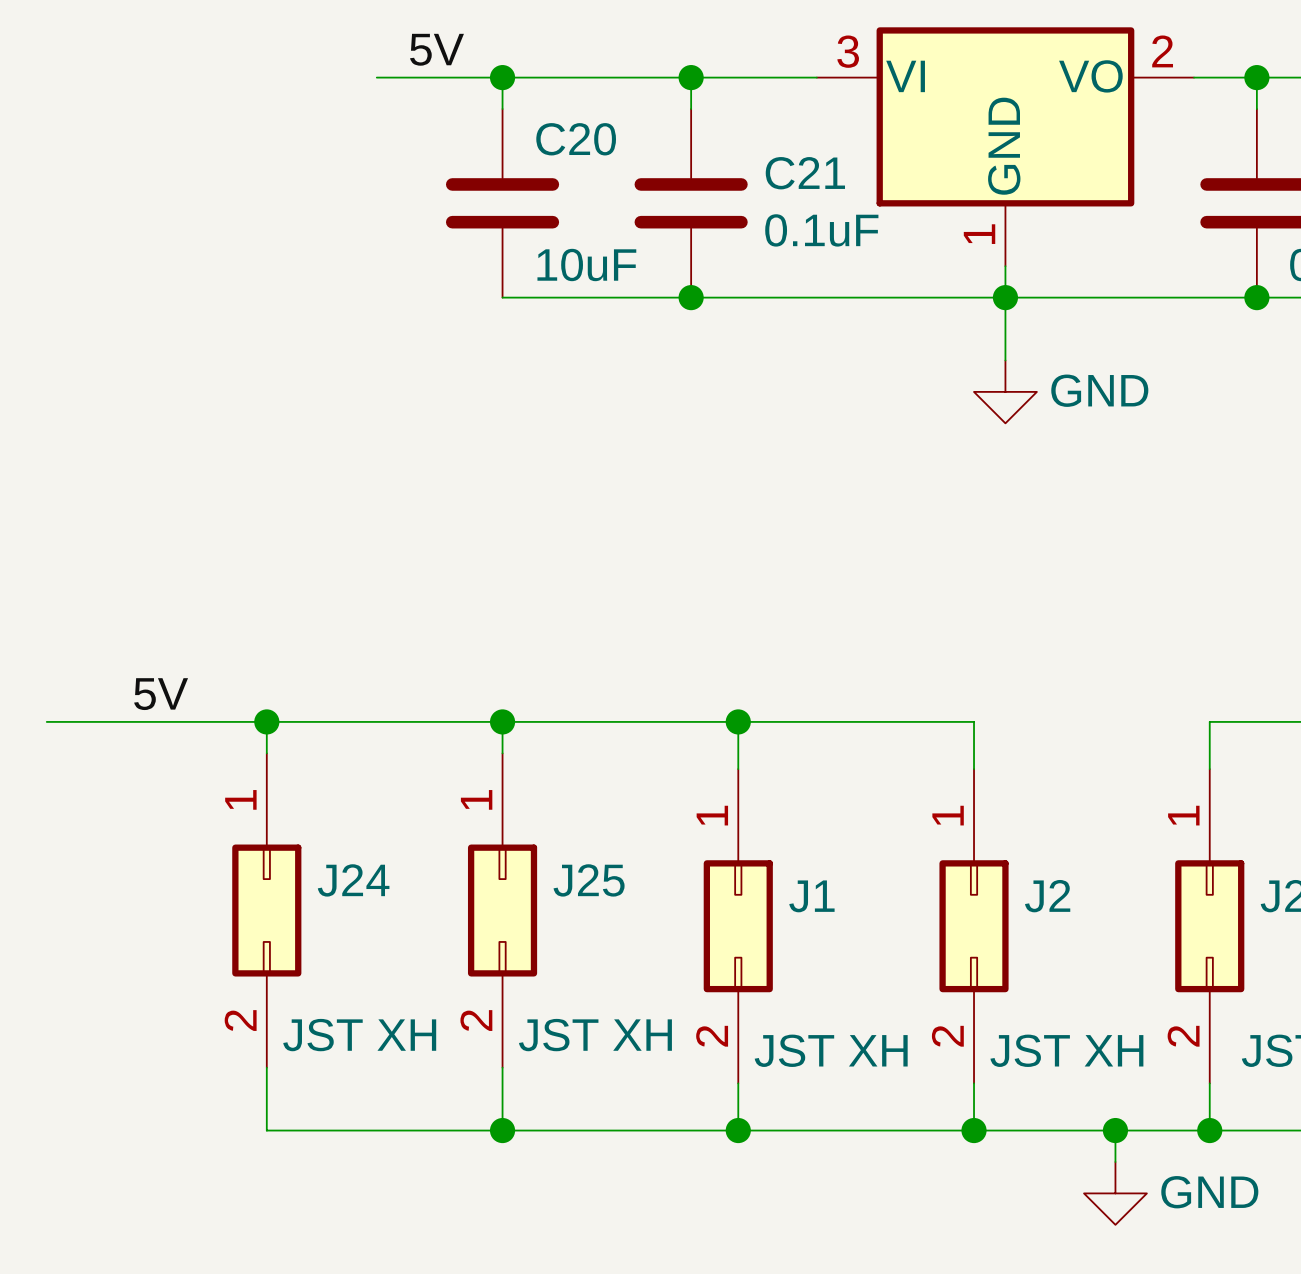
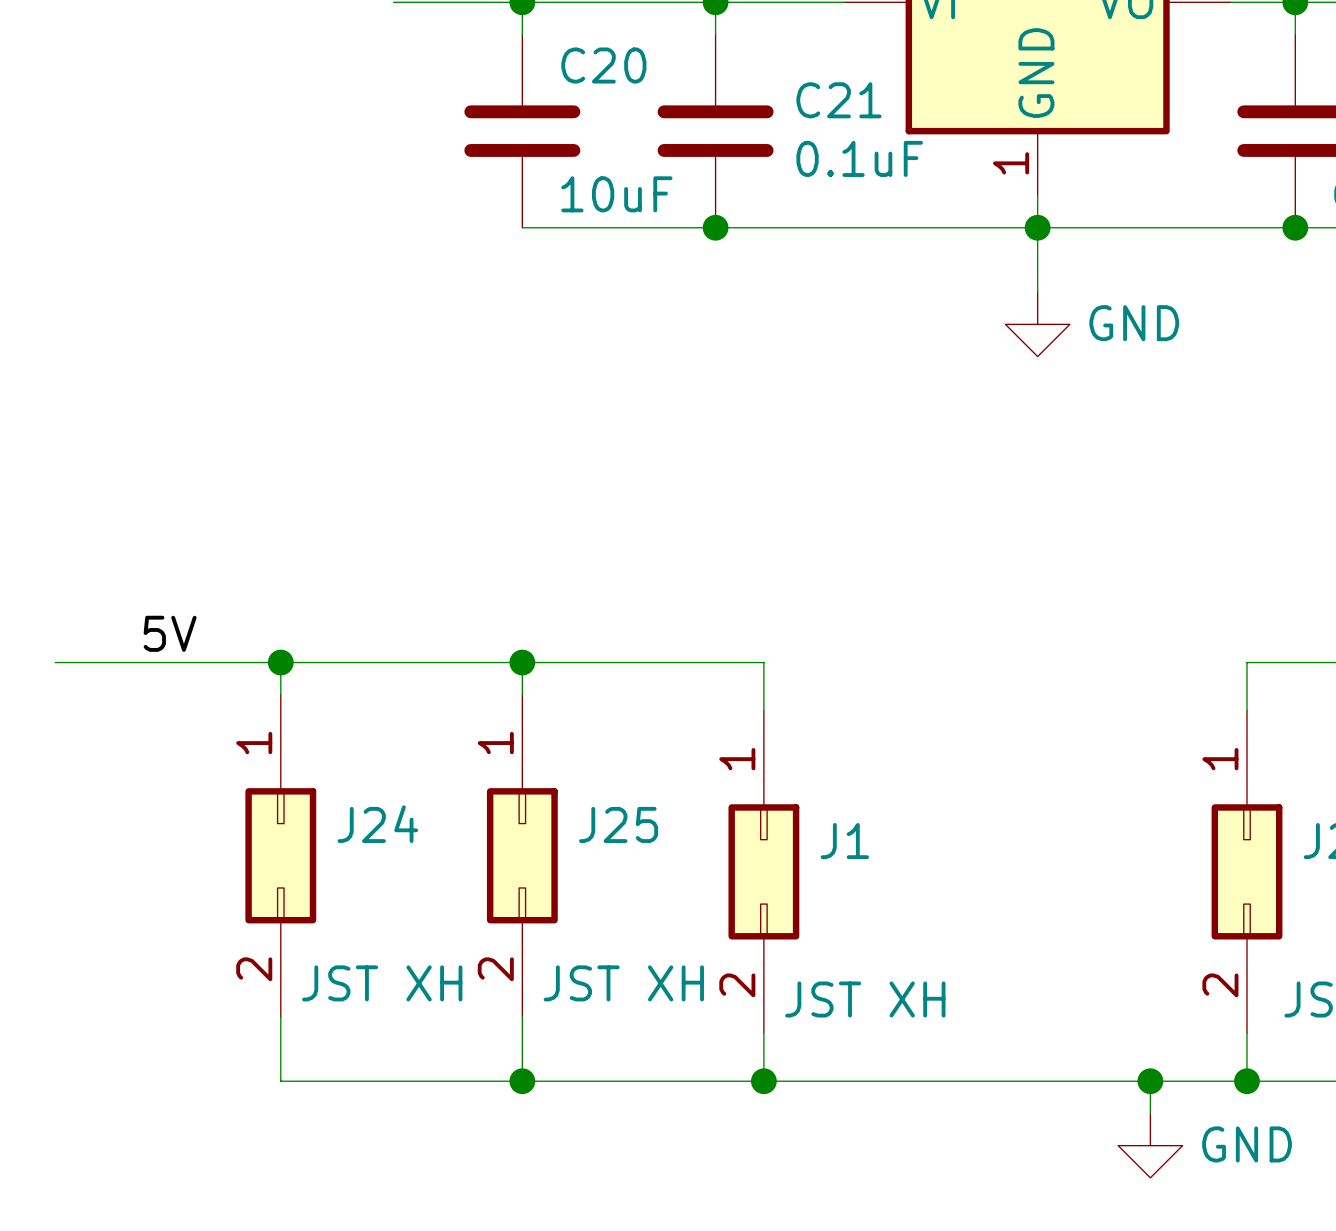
wire: (738, 721) (974, 721) (974, 769) -> none
junction: (738, 721) -> none
J2: JST XH (974, 926) -> none
wire: (974, 1083) (974, 1130) -> none
junction: (974, 1130) -> none

